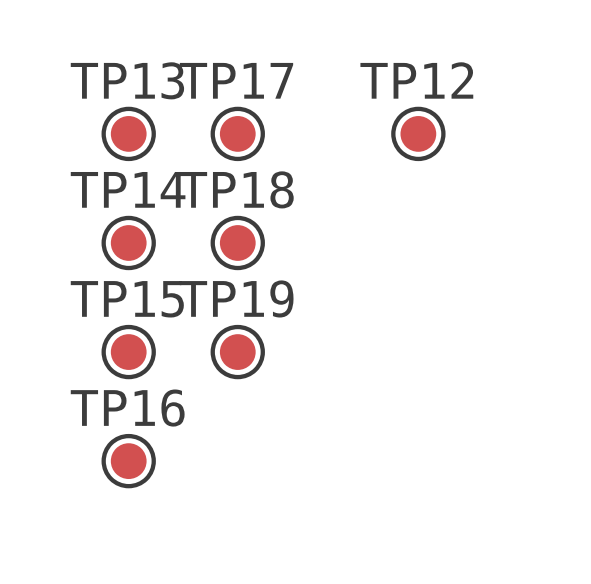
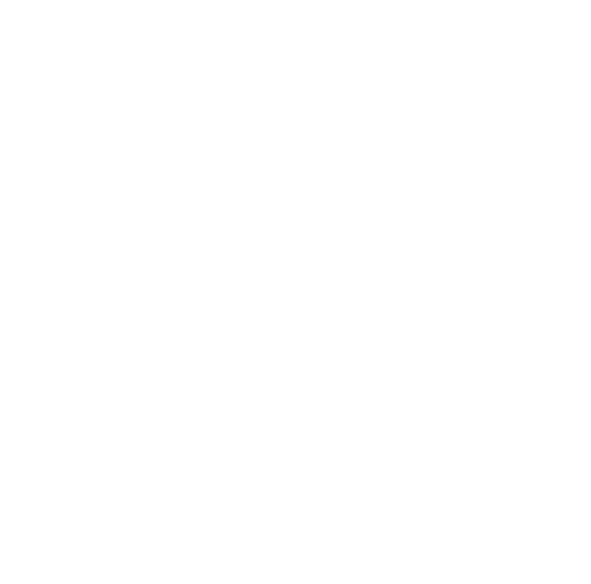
TP13: (128, 133) -> none
TP17: (237, 133) -> none
TP12: (418, 133) -> none
TP14: (128, 242) -> none
TP18: (237, 242) -> none
TP15: (128, 352) -> none
TP19: (237, 352) -> none
TP16: (128, 461) -> none

